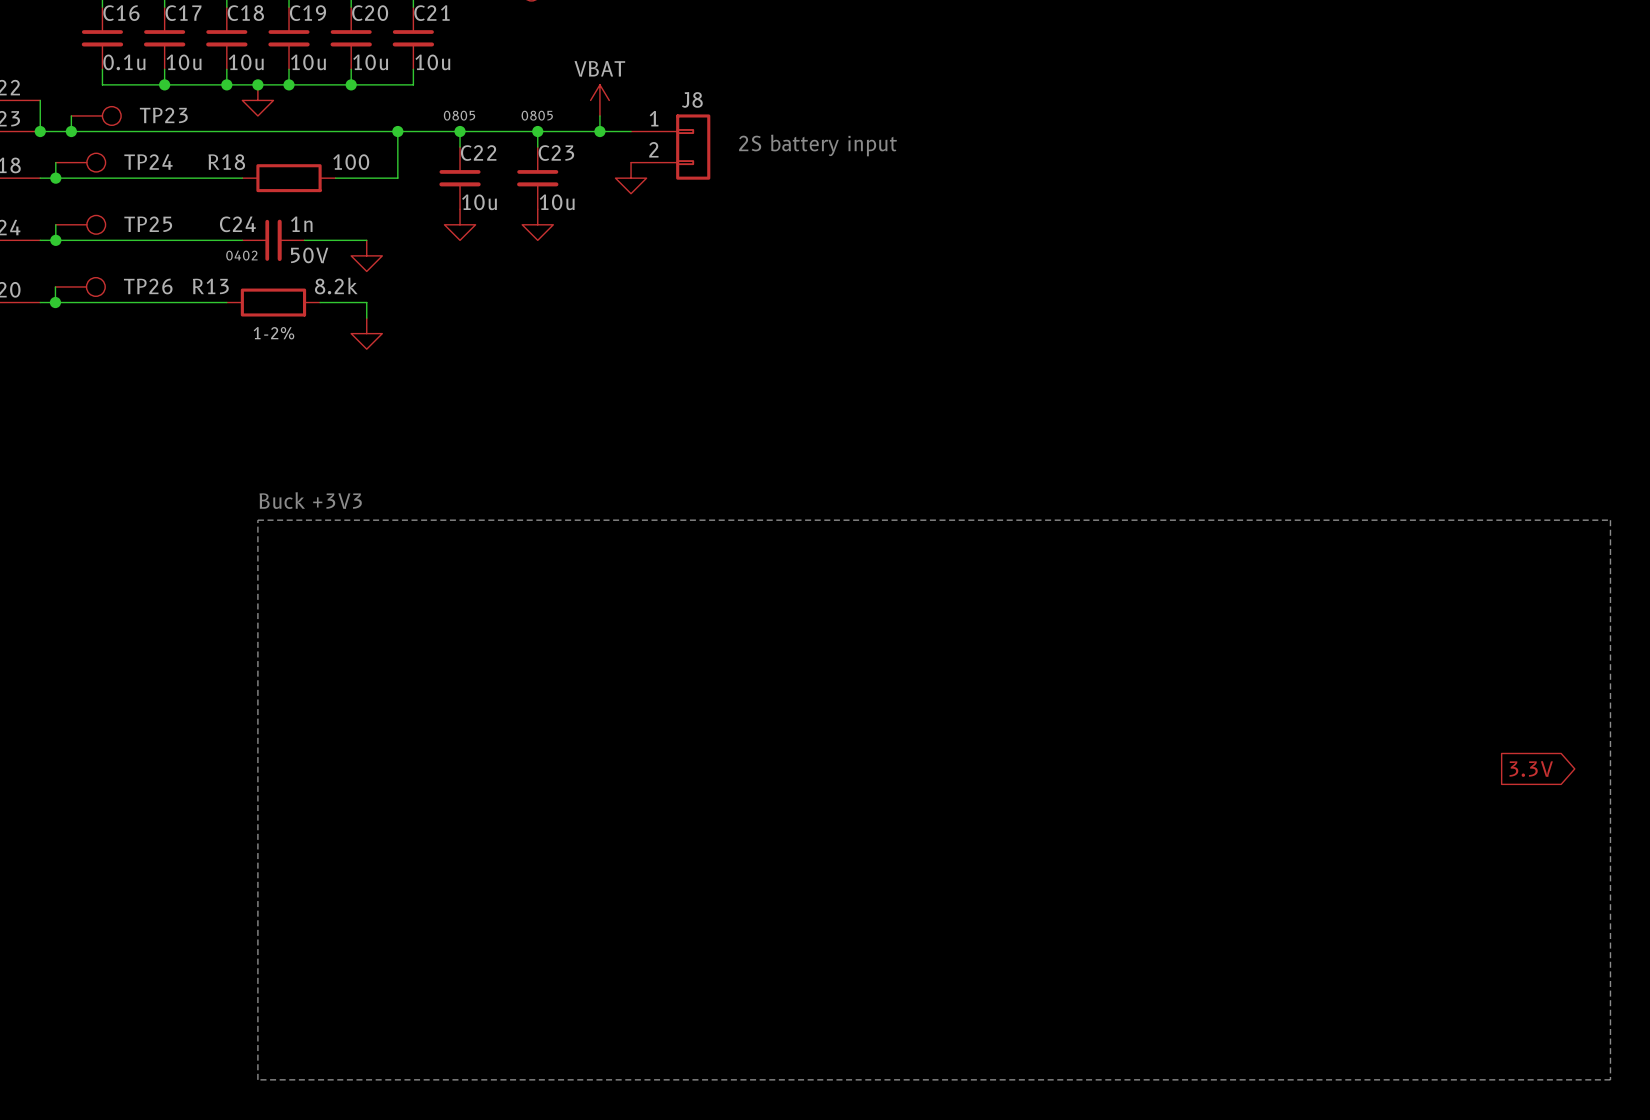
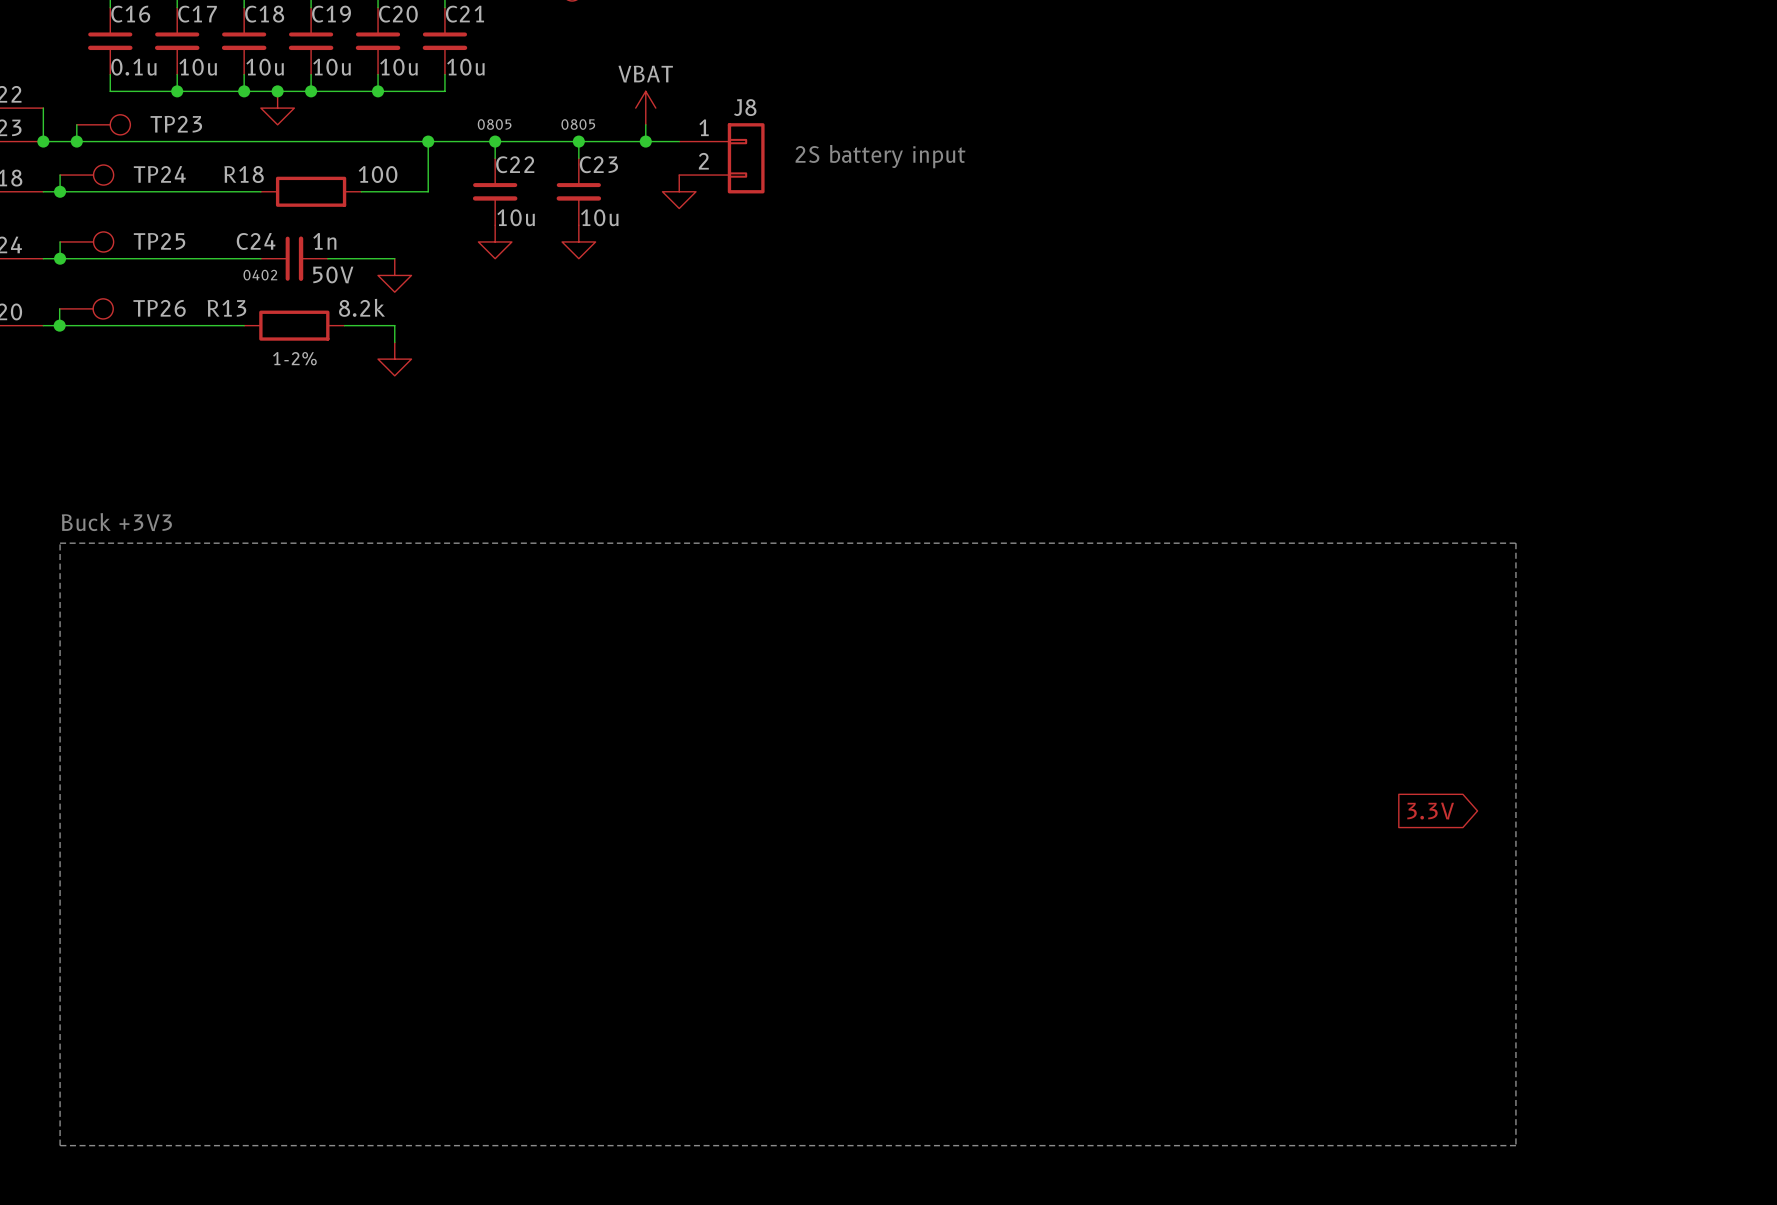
text position: Buck +3V3 (310, 500) -> Buck +3V3 (116, 522)
line: (257, 520) (1610, 520) (1610, 1079) (257, 1079) (257, 520) -> (60, 543) (60, 1145) (1515, 1145) (1515, 543) (60, 543)
global label position: 3.3V (1531, 769) -> 3.3V (1430, 811)

